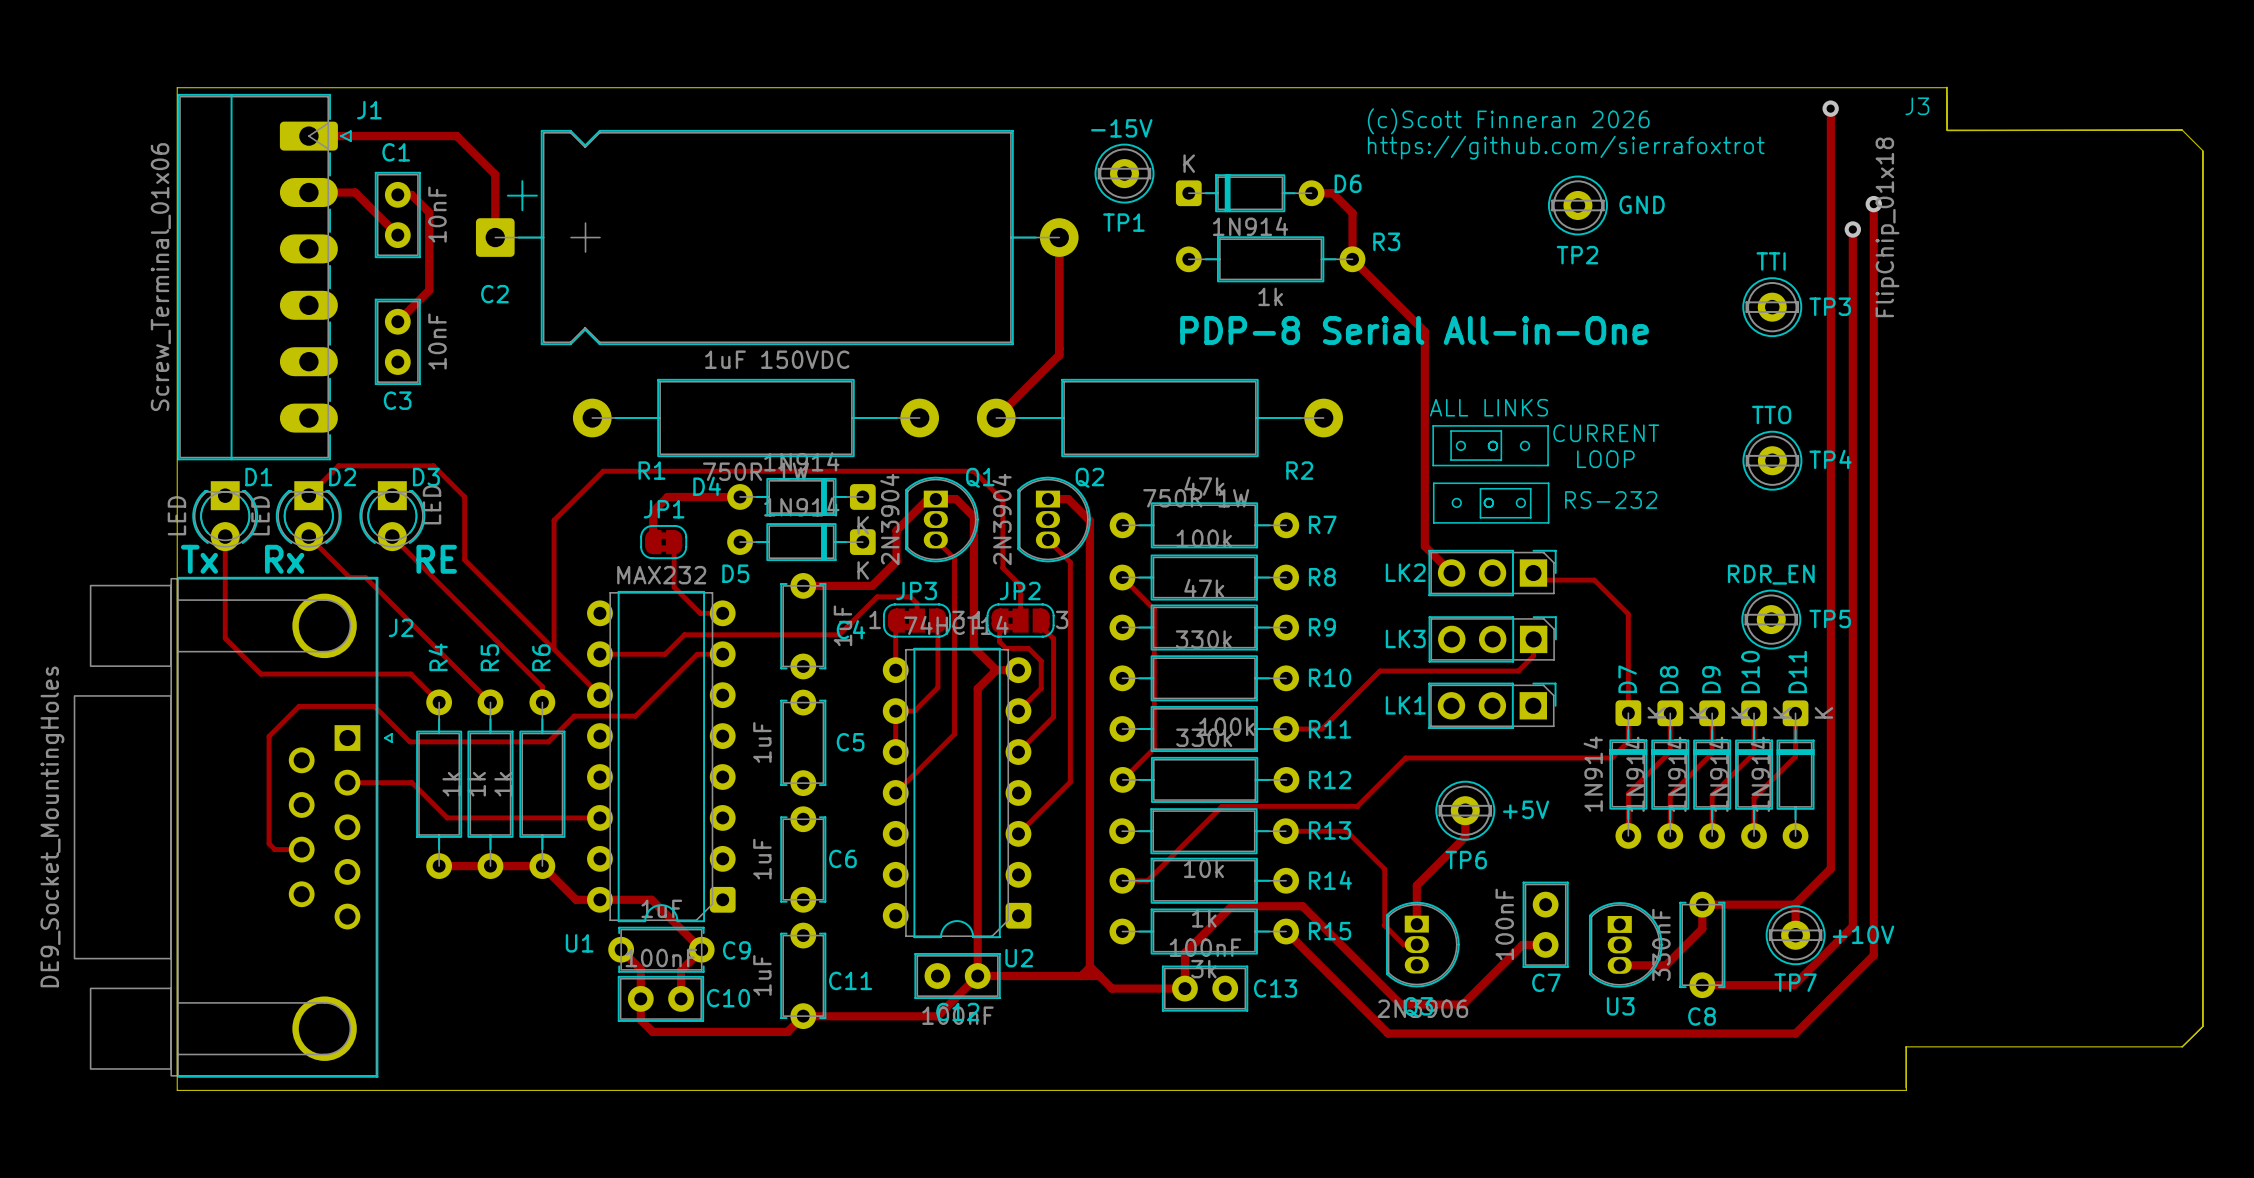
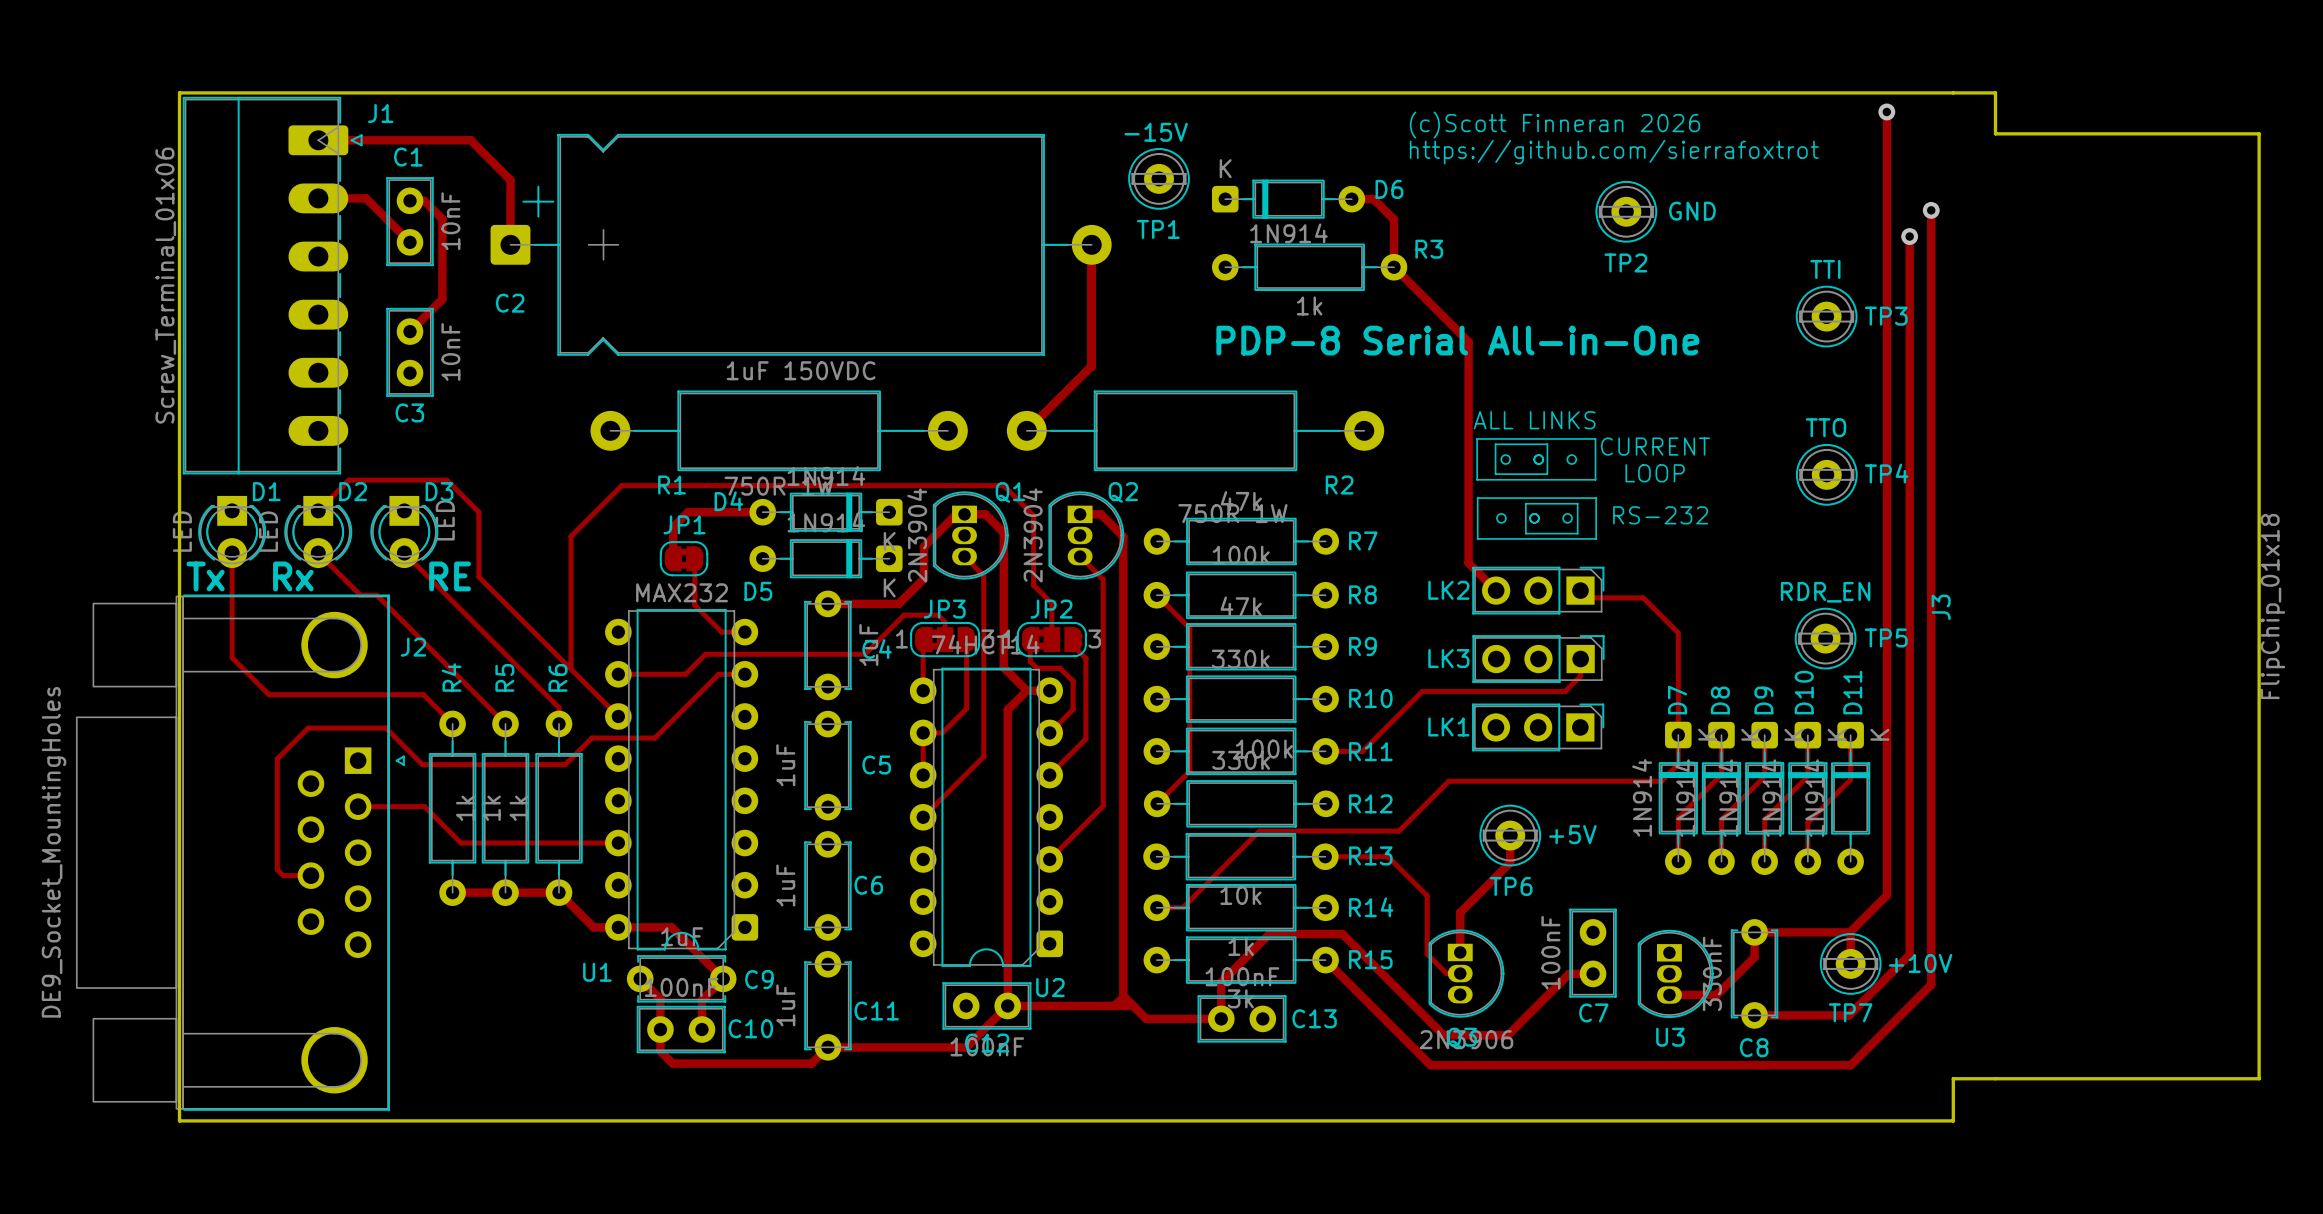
J3 footprint: [1905, 86, 2204, 1089] -> [177, 91, 2261, 1123]
J3 name position: J3 (1917, 106) -> J3 (1941, 607)
board edge: (1947, 130) (1946, 87) (177, 87) (177, 1090) (1906, 1090) (1906, 1046) -> none
board edge: (2182, 130) (1947, 130) -> none
board edge: (2203, 151) (2203, 1026) (2182, 1046) -> none
J3 value position: FlipChip_01x18 (1887, 227) -> FlipChip_01x18 (2272, 606)

